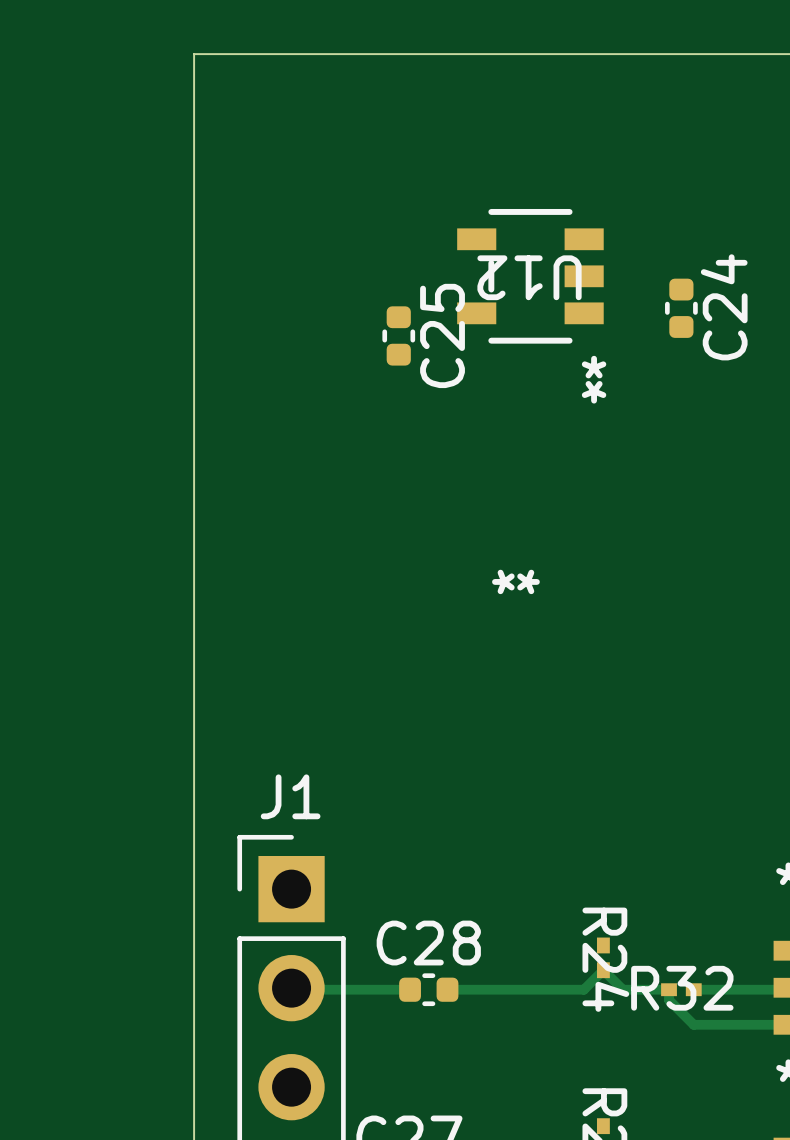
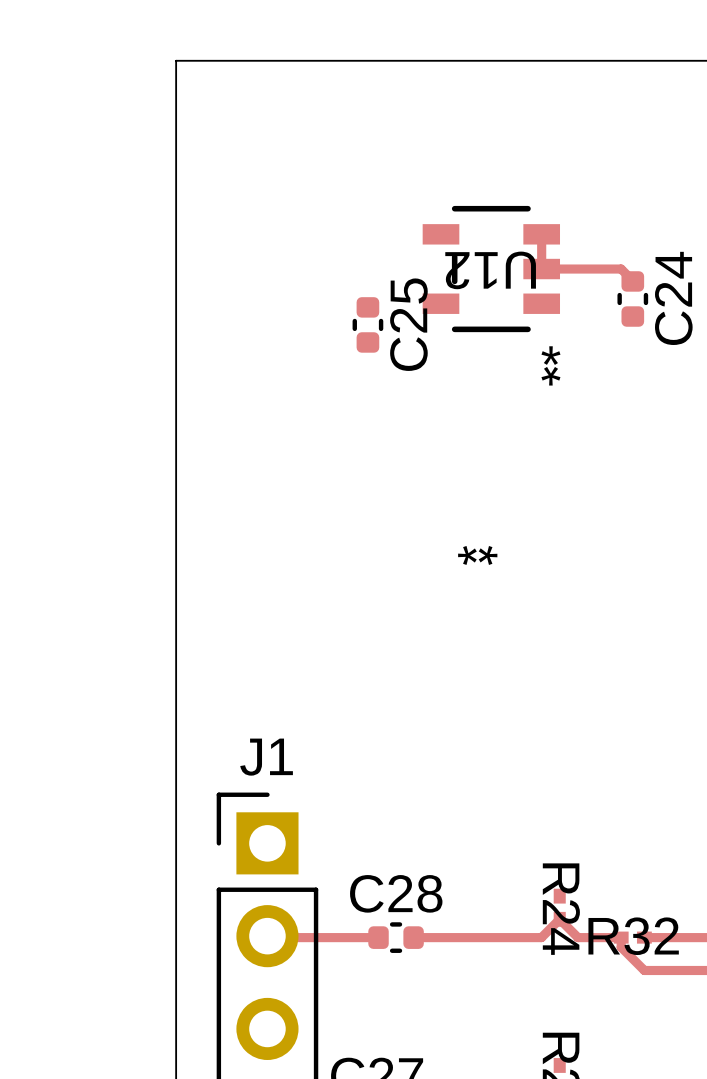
track: none -> (541, 234) (541, 269) (621, 269) (632, 280)

